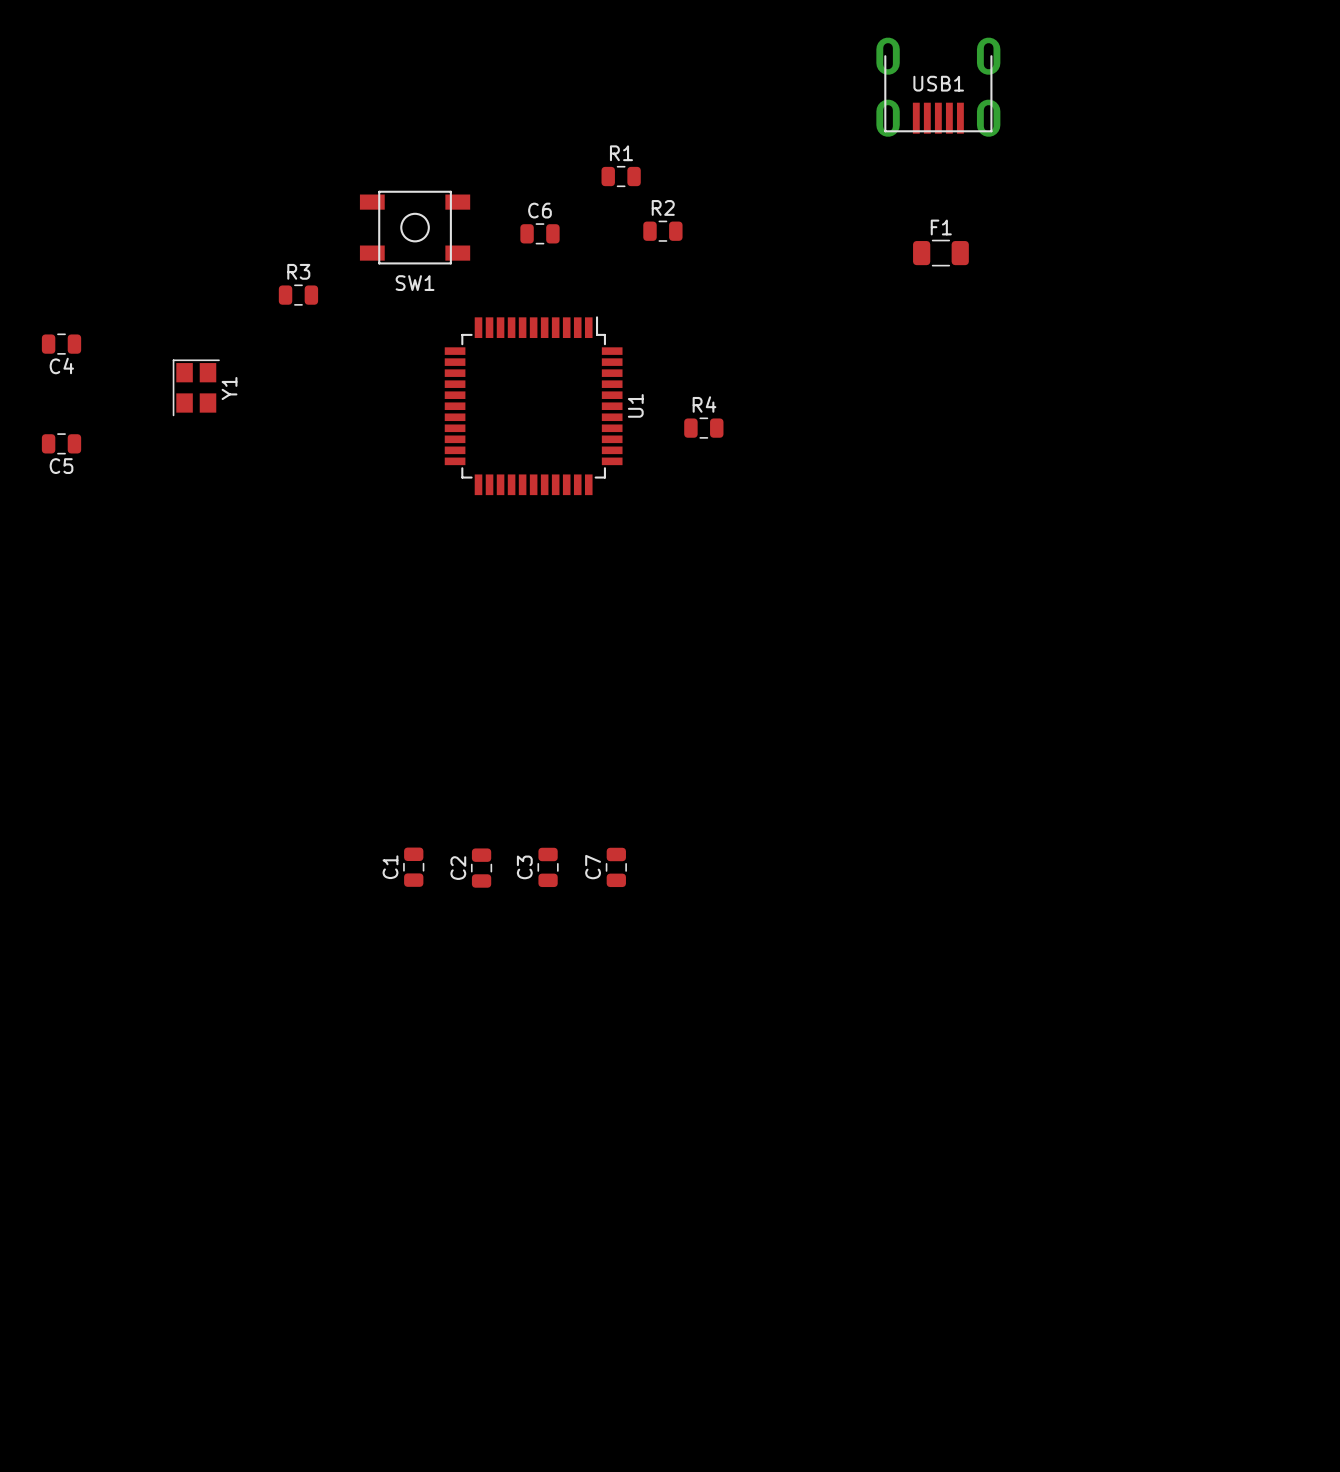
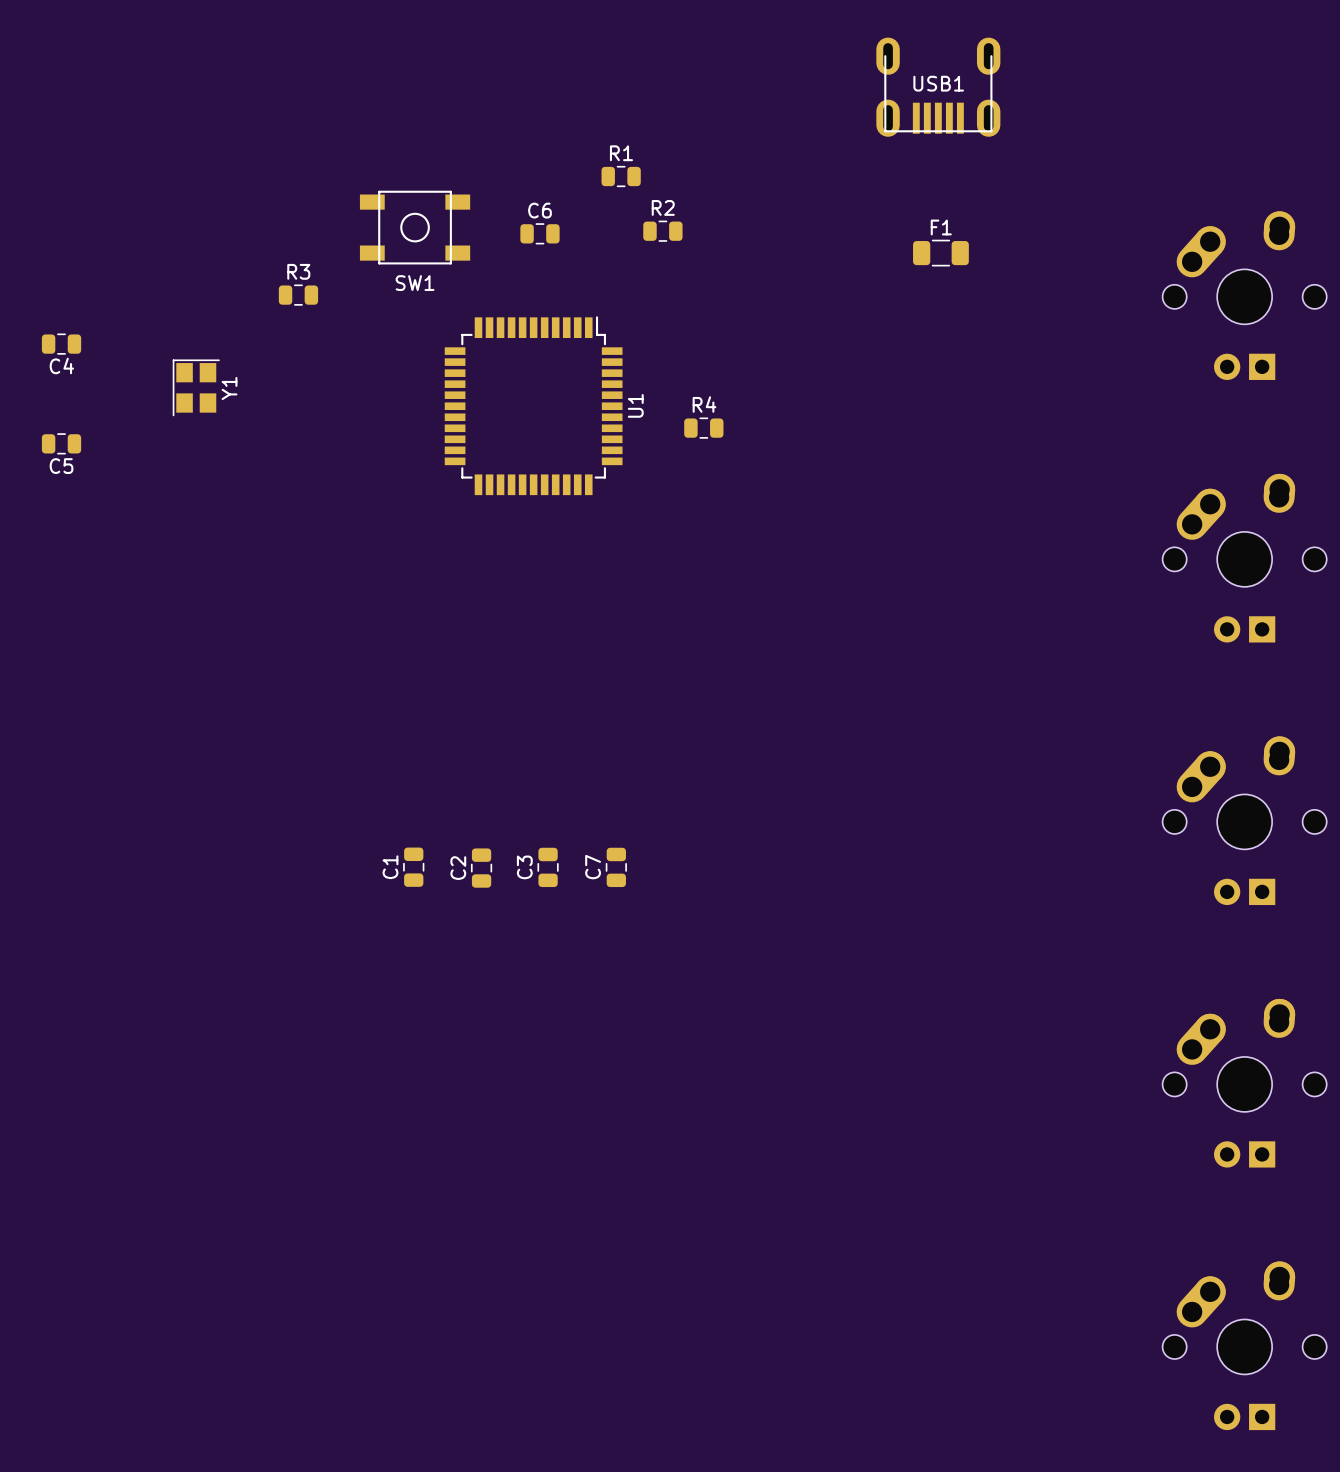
part: none -> (1244, 295)
part: none -> (1244, 558)
part: none -> (1244, 820)
part: none -> (1244, 1083)
part: none -> (1244, 1345)

